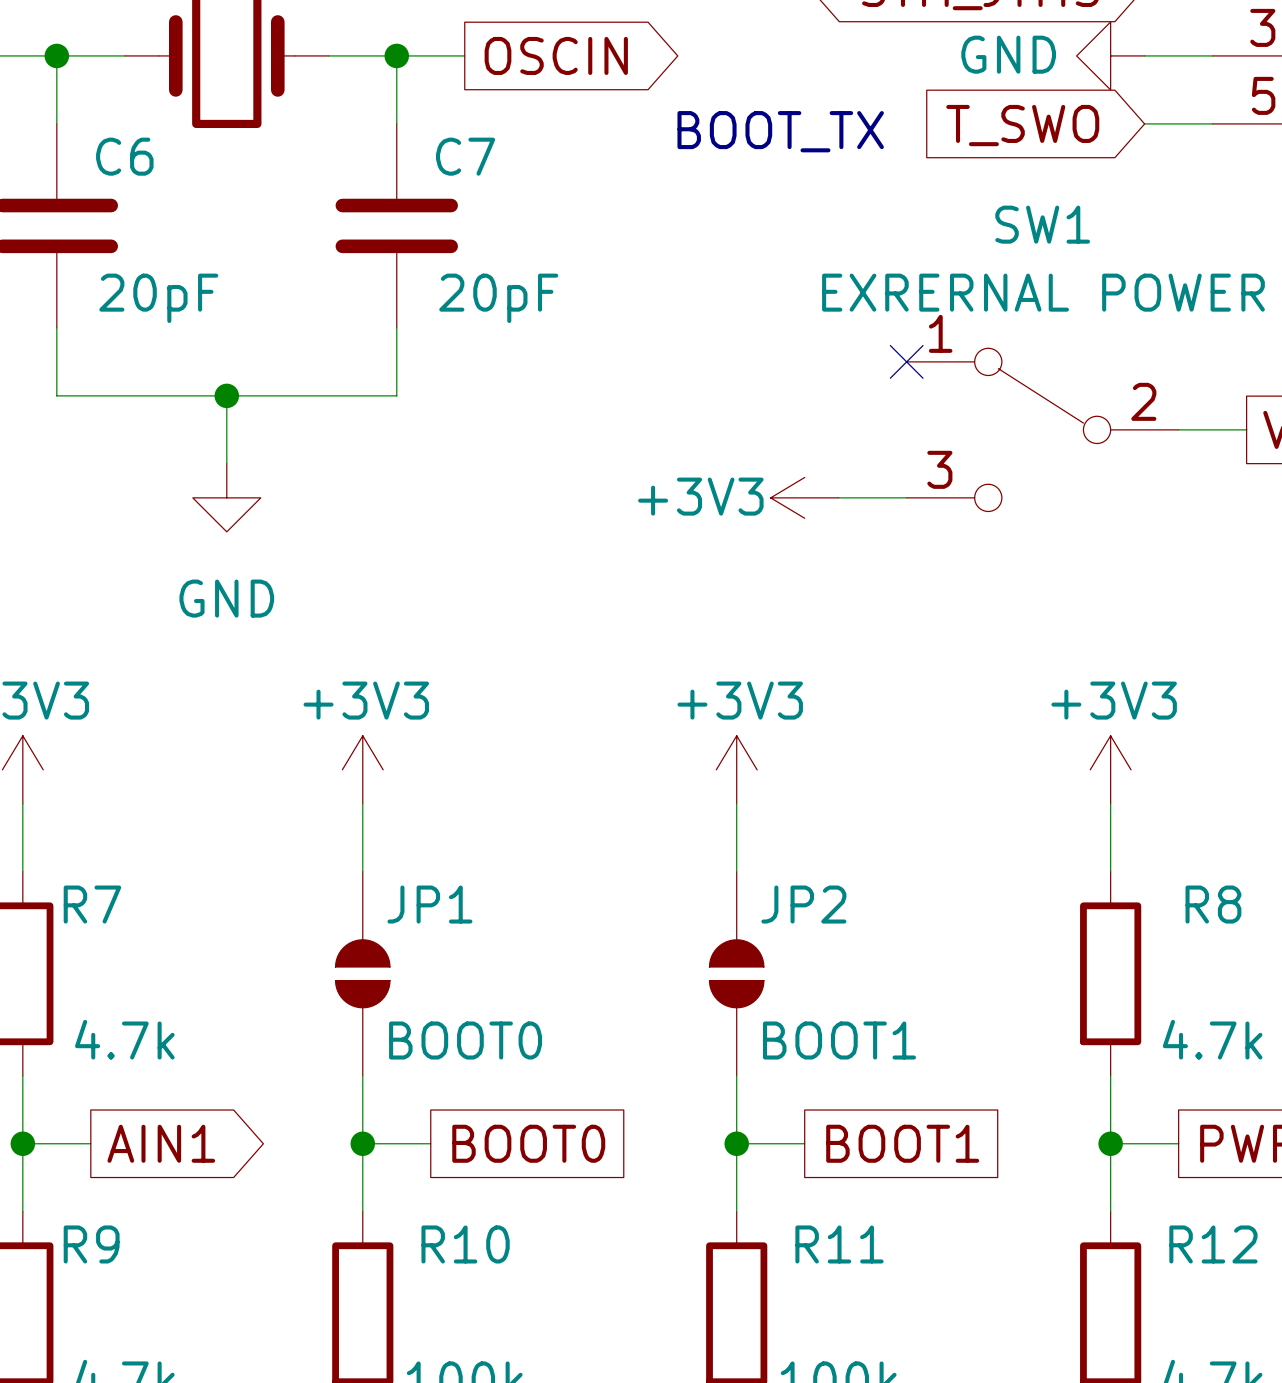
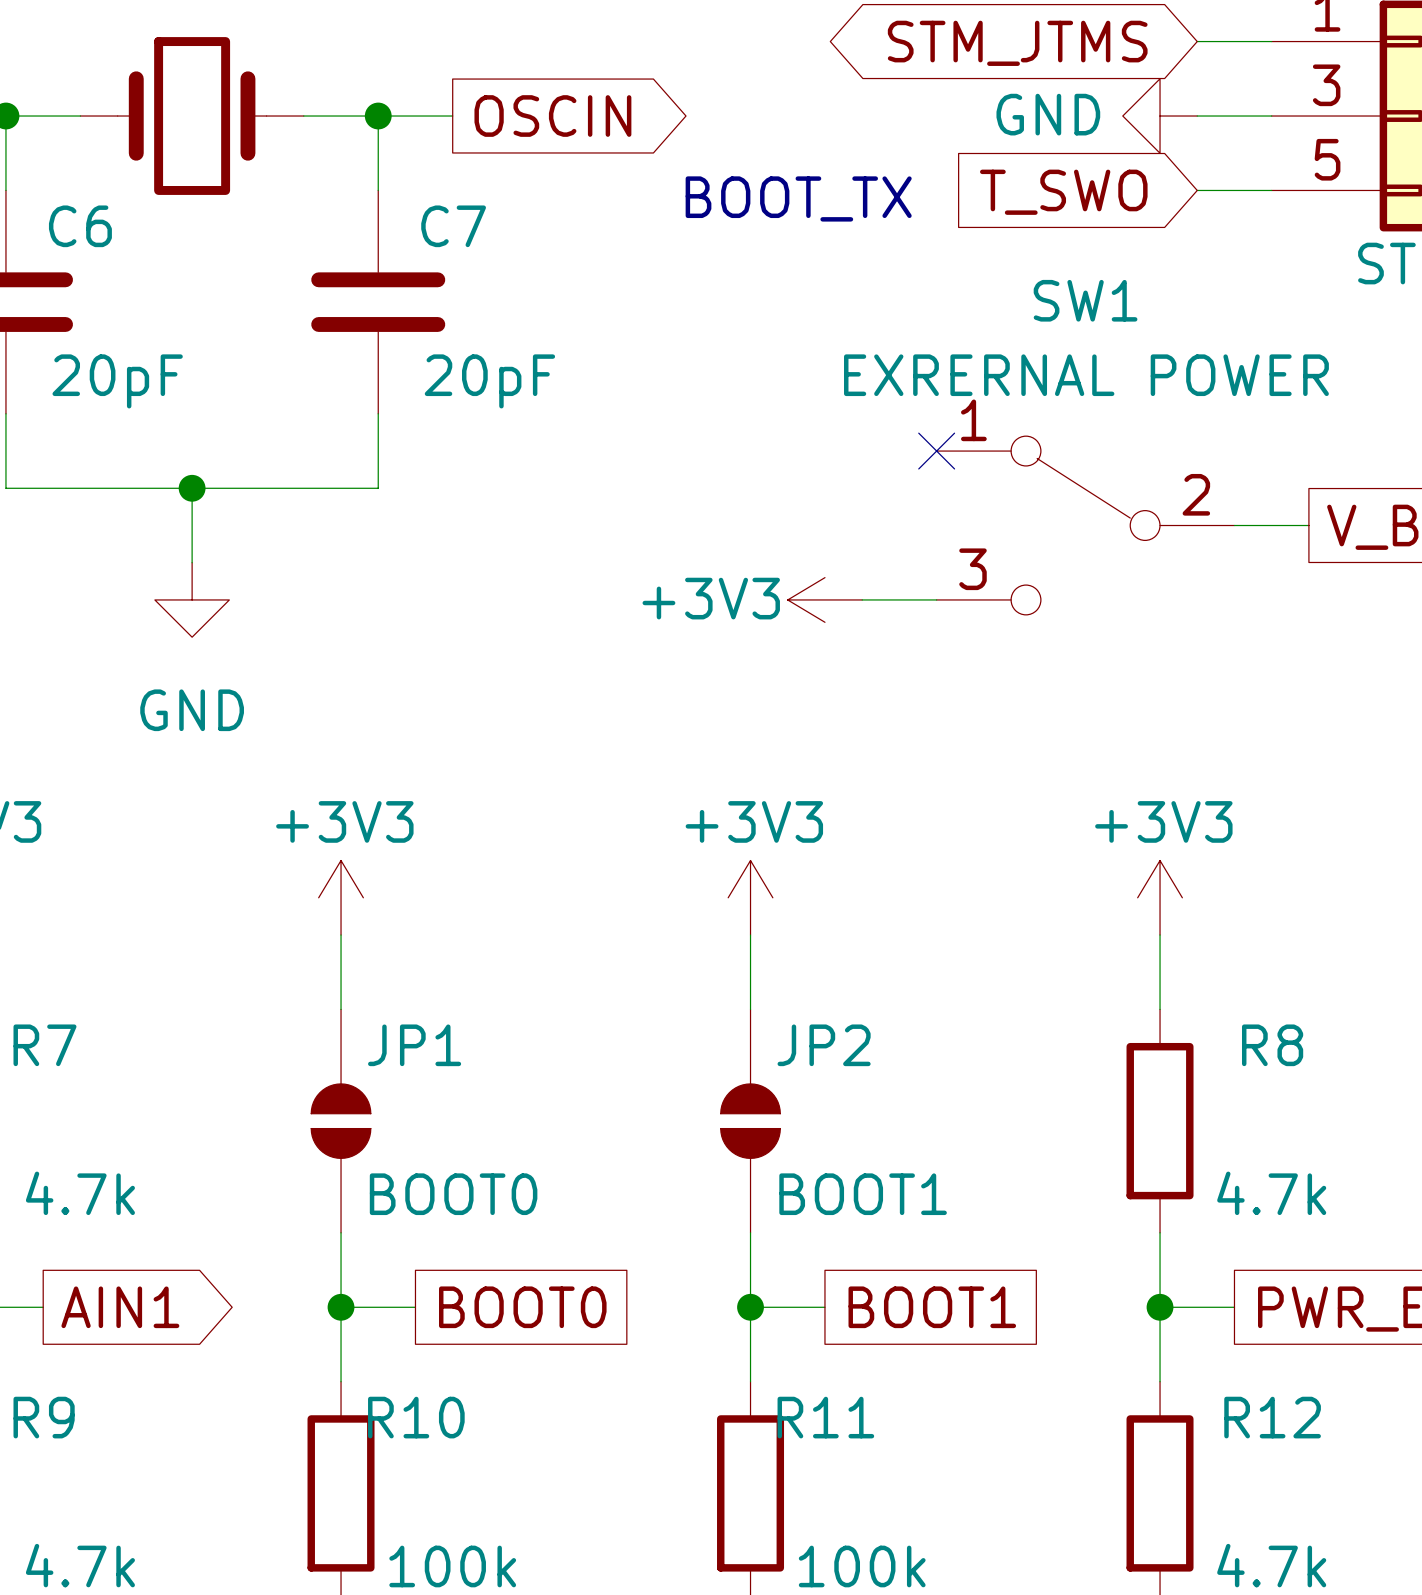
R10 name position: R10 (465, 1244) -> R10 (416, 1417)
R11 name position: R11 (839, 1244) -> R11 (825, 1417)

